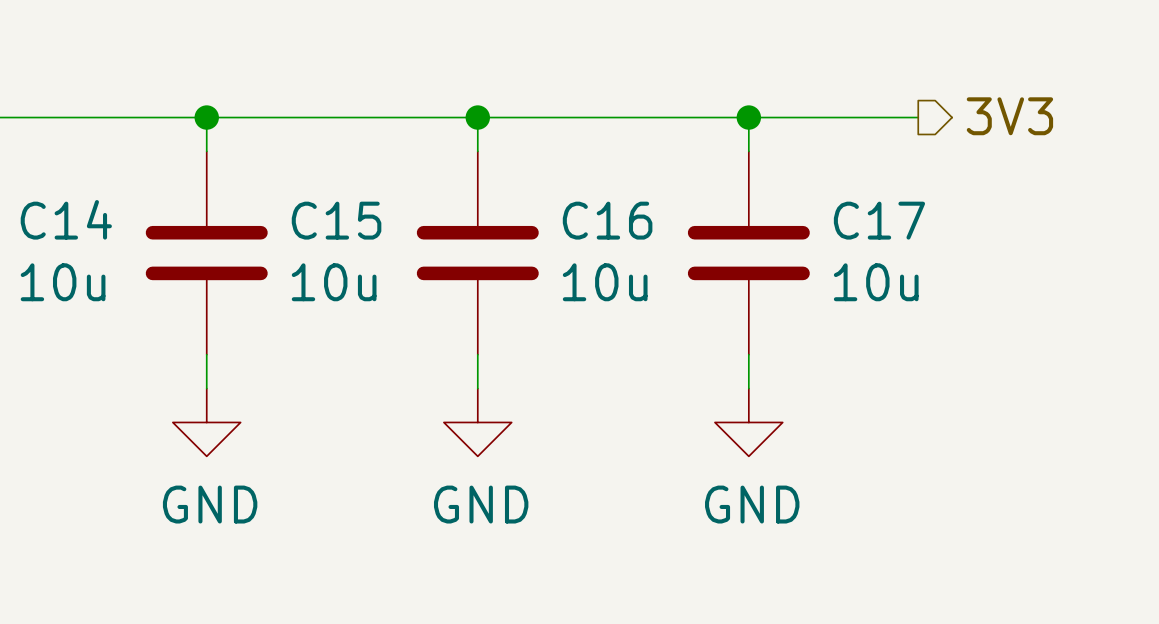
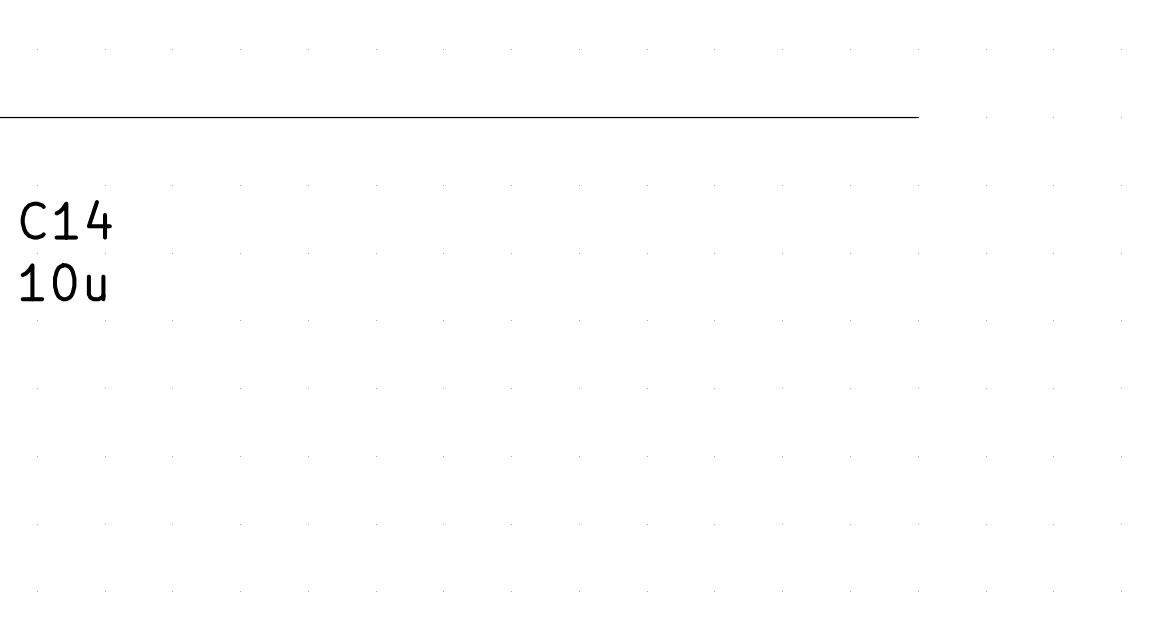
hierarchical label: 3V3 (1009, 116) -> none
wire: (206, 117) (206, 151) -> none
junction: (206, 117) -> none
wire: (477, 117) (477, 151) -> none
junction: (477, 117) -> none
wire: (748, 117) (748, 151) -> none
junction: (748, 117) -> none
C15: 10u (206, 253) -> none
C16: 10u (477, 253) -> none
C17: 10u (748, 253) -> none
wire: (206, 354) (206, 388) -> none
wire: (477, 354) (477, 388) -> none
wire: (748, 354) (748, 388) -> none
power symbol: GND (206, 422) -> none
power symbol: GND (477, 422) -> none
power symbol: GND (748, 422) -> none

